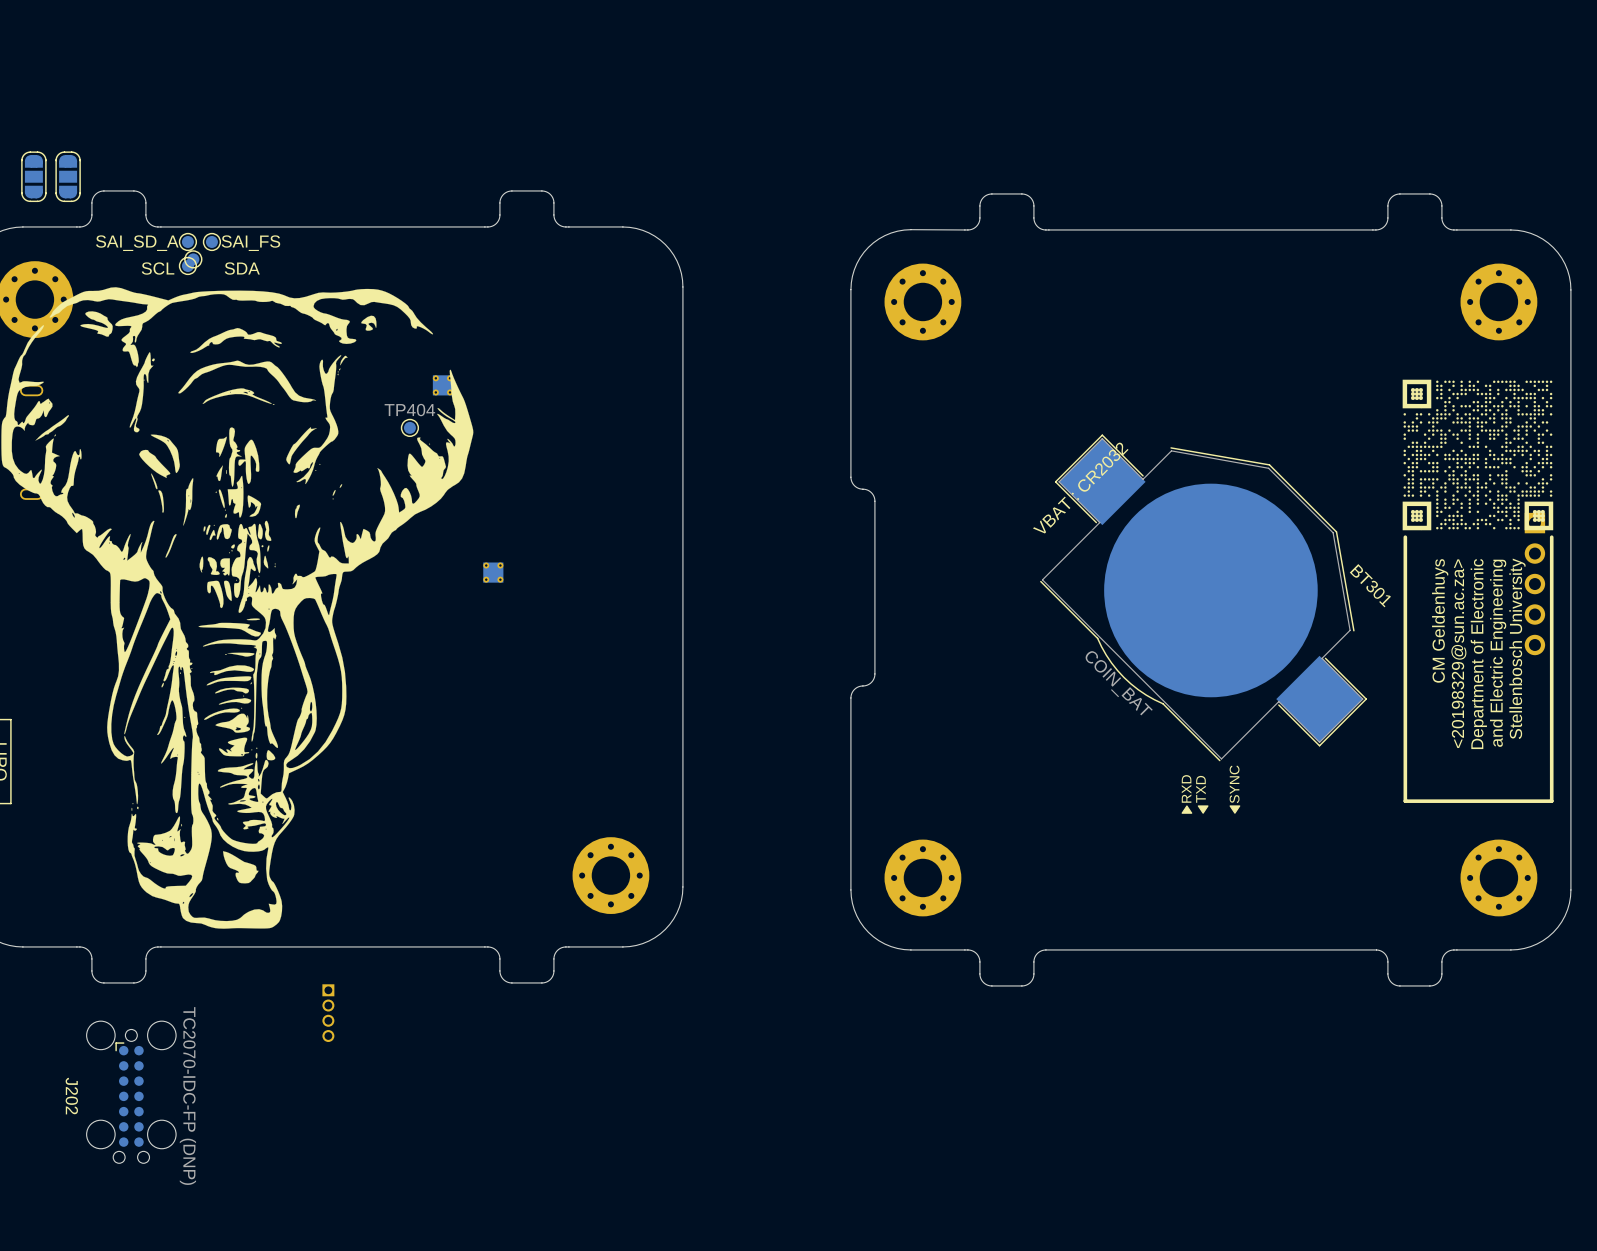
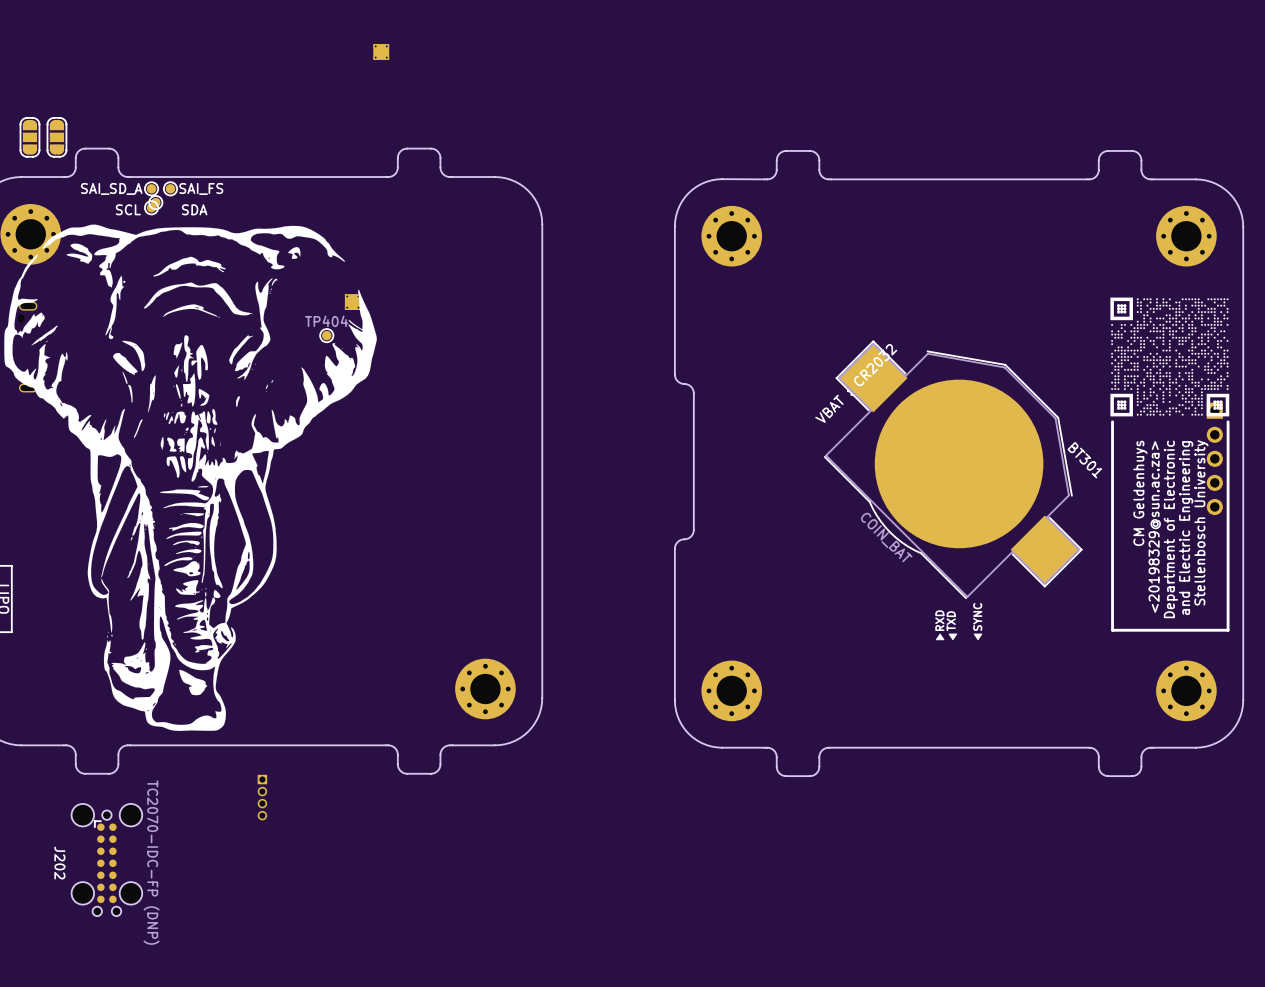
part: none -> (381, 51)
part: (493, 572) -> none

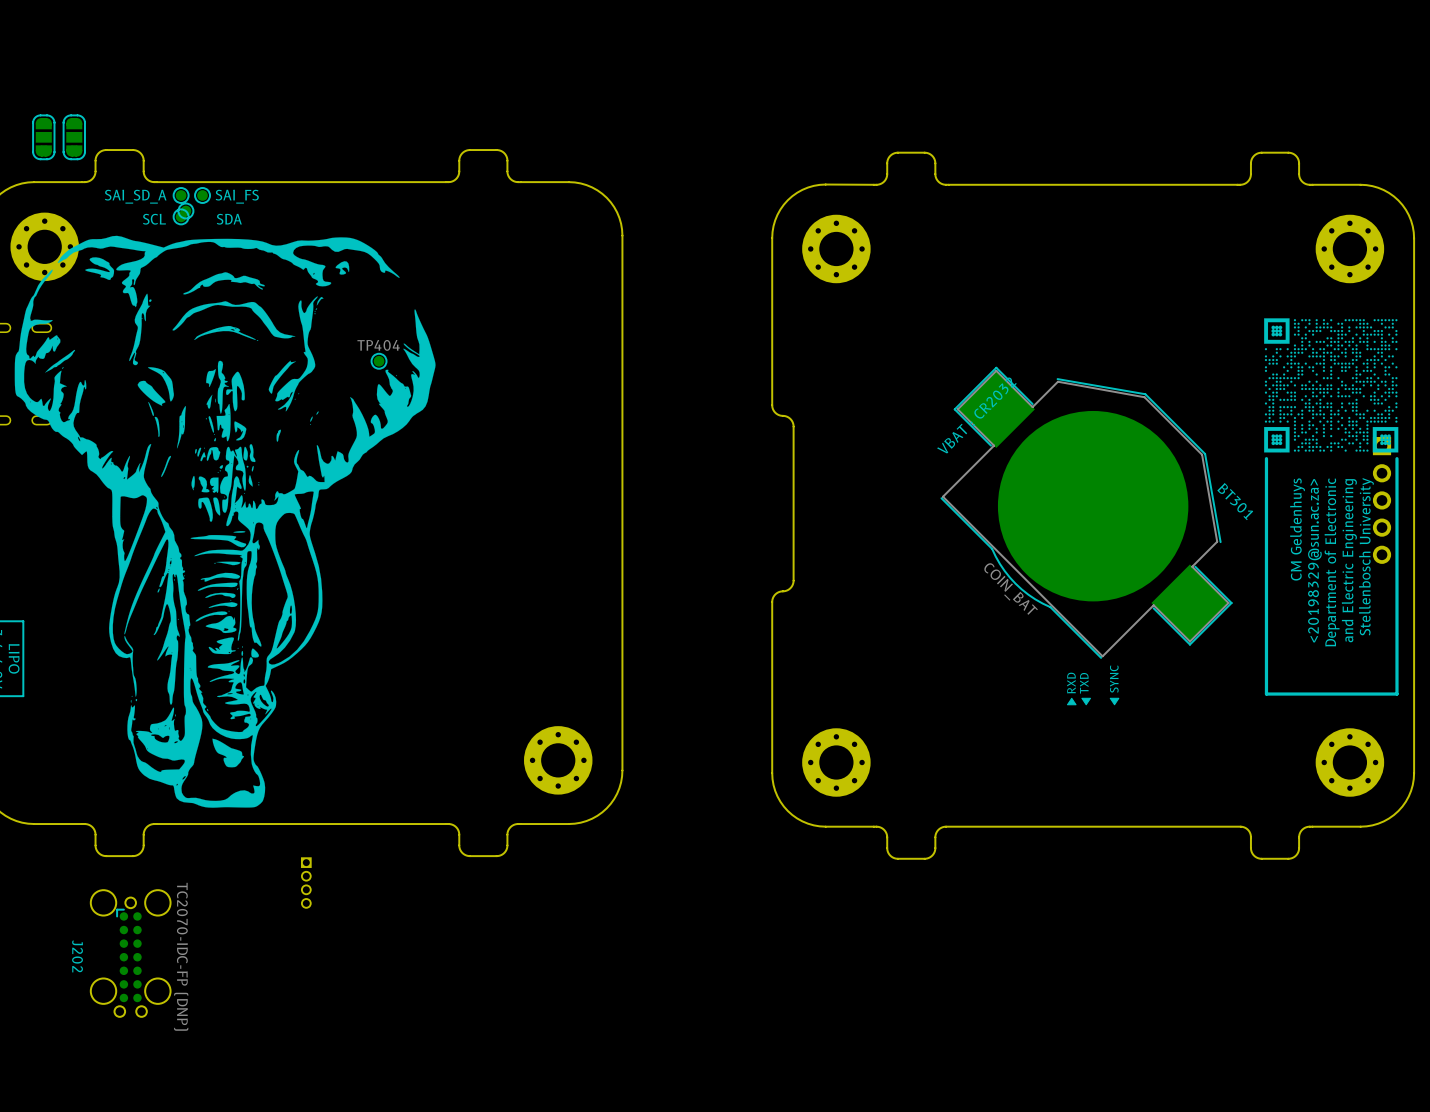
part: (381, 51) -> none
part: (352, 302) -> none

